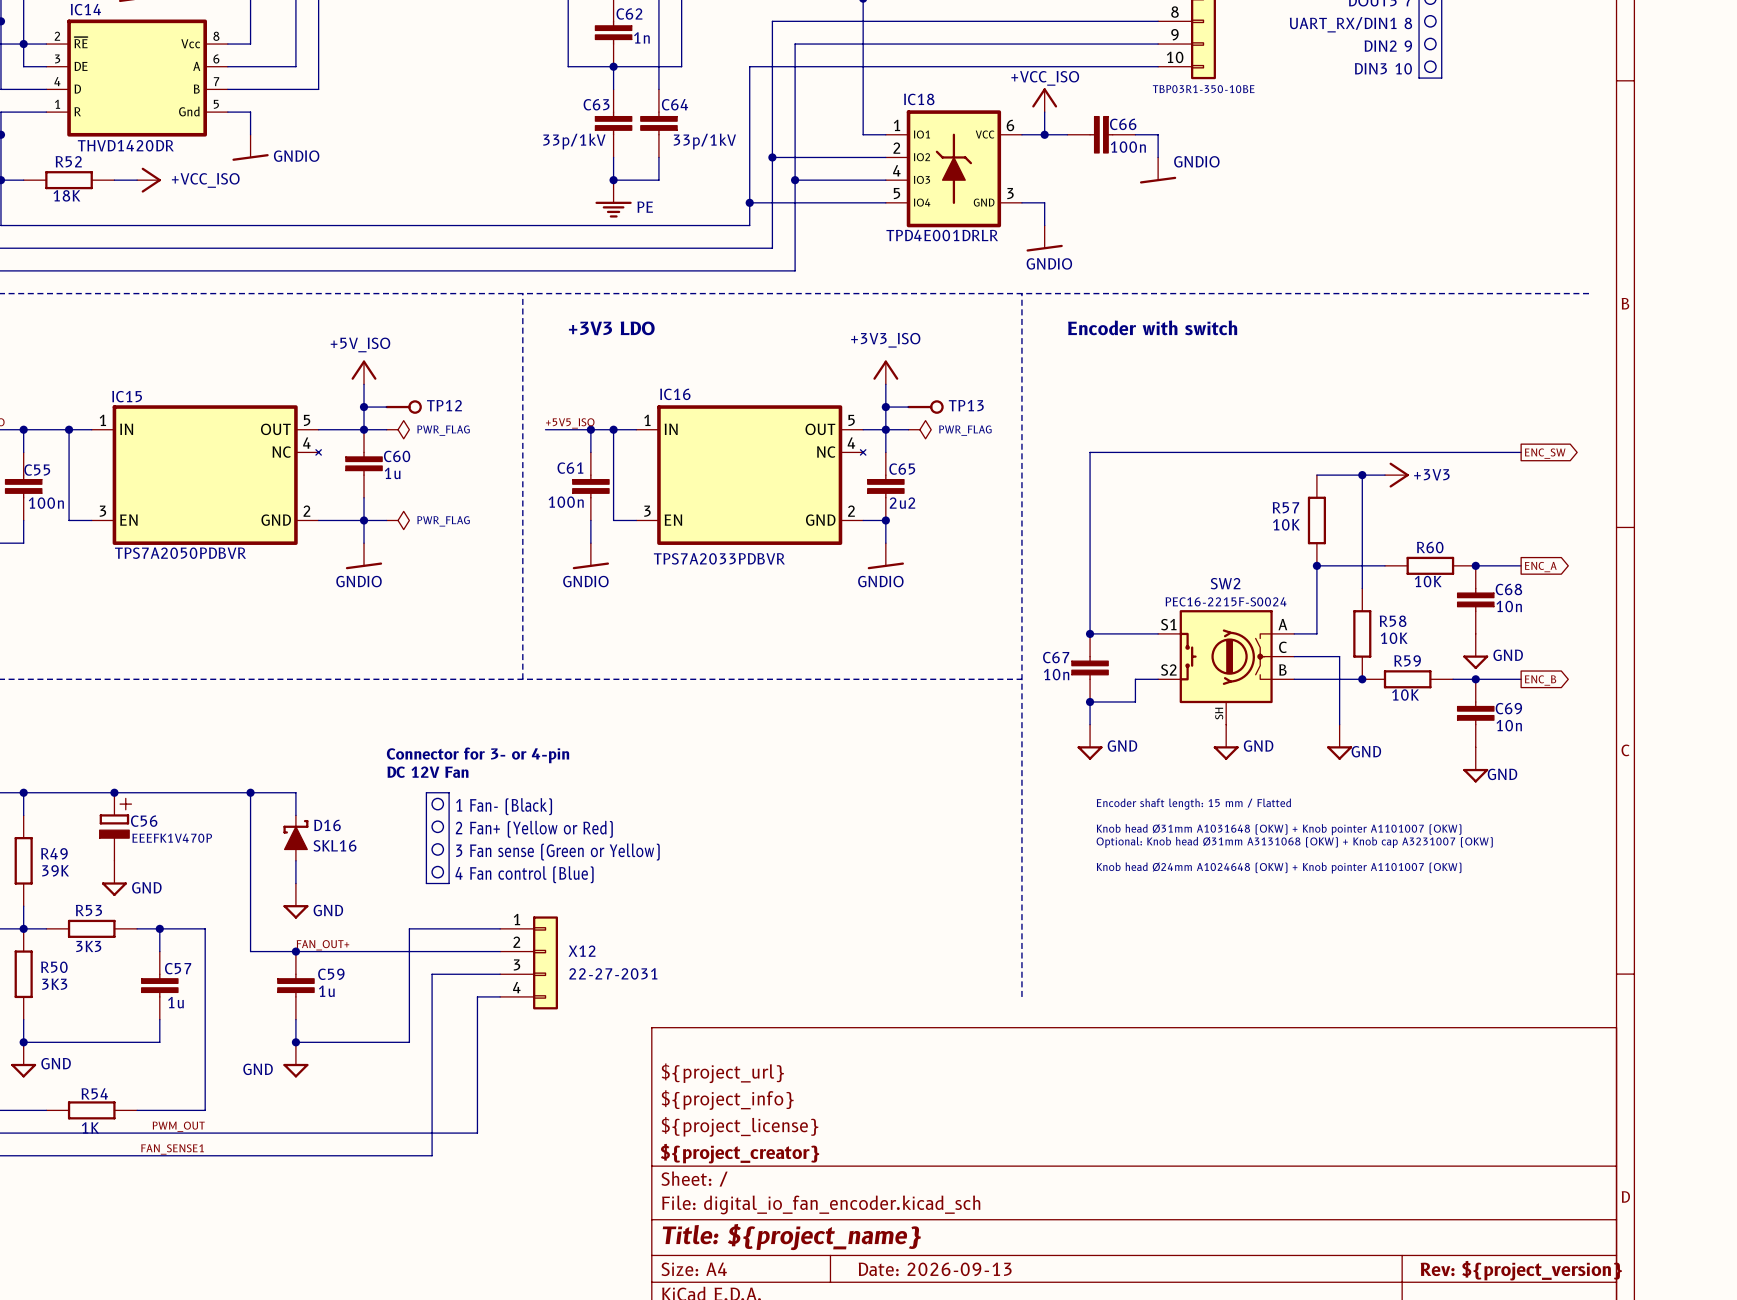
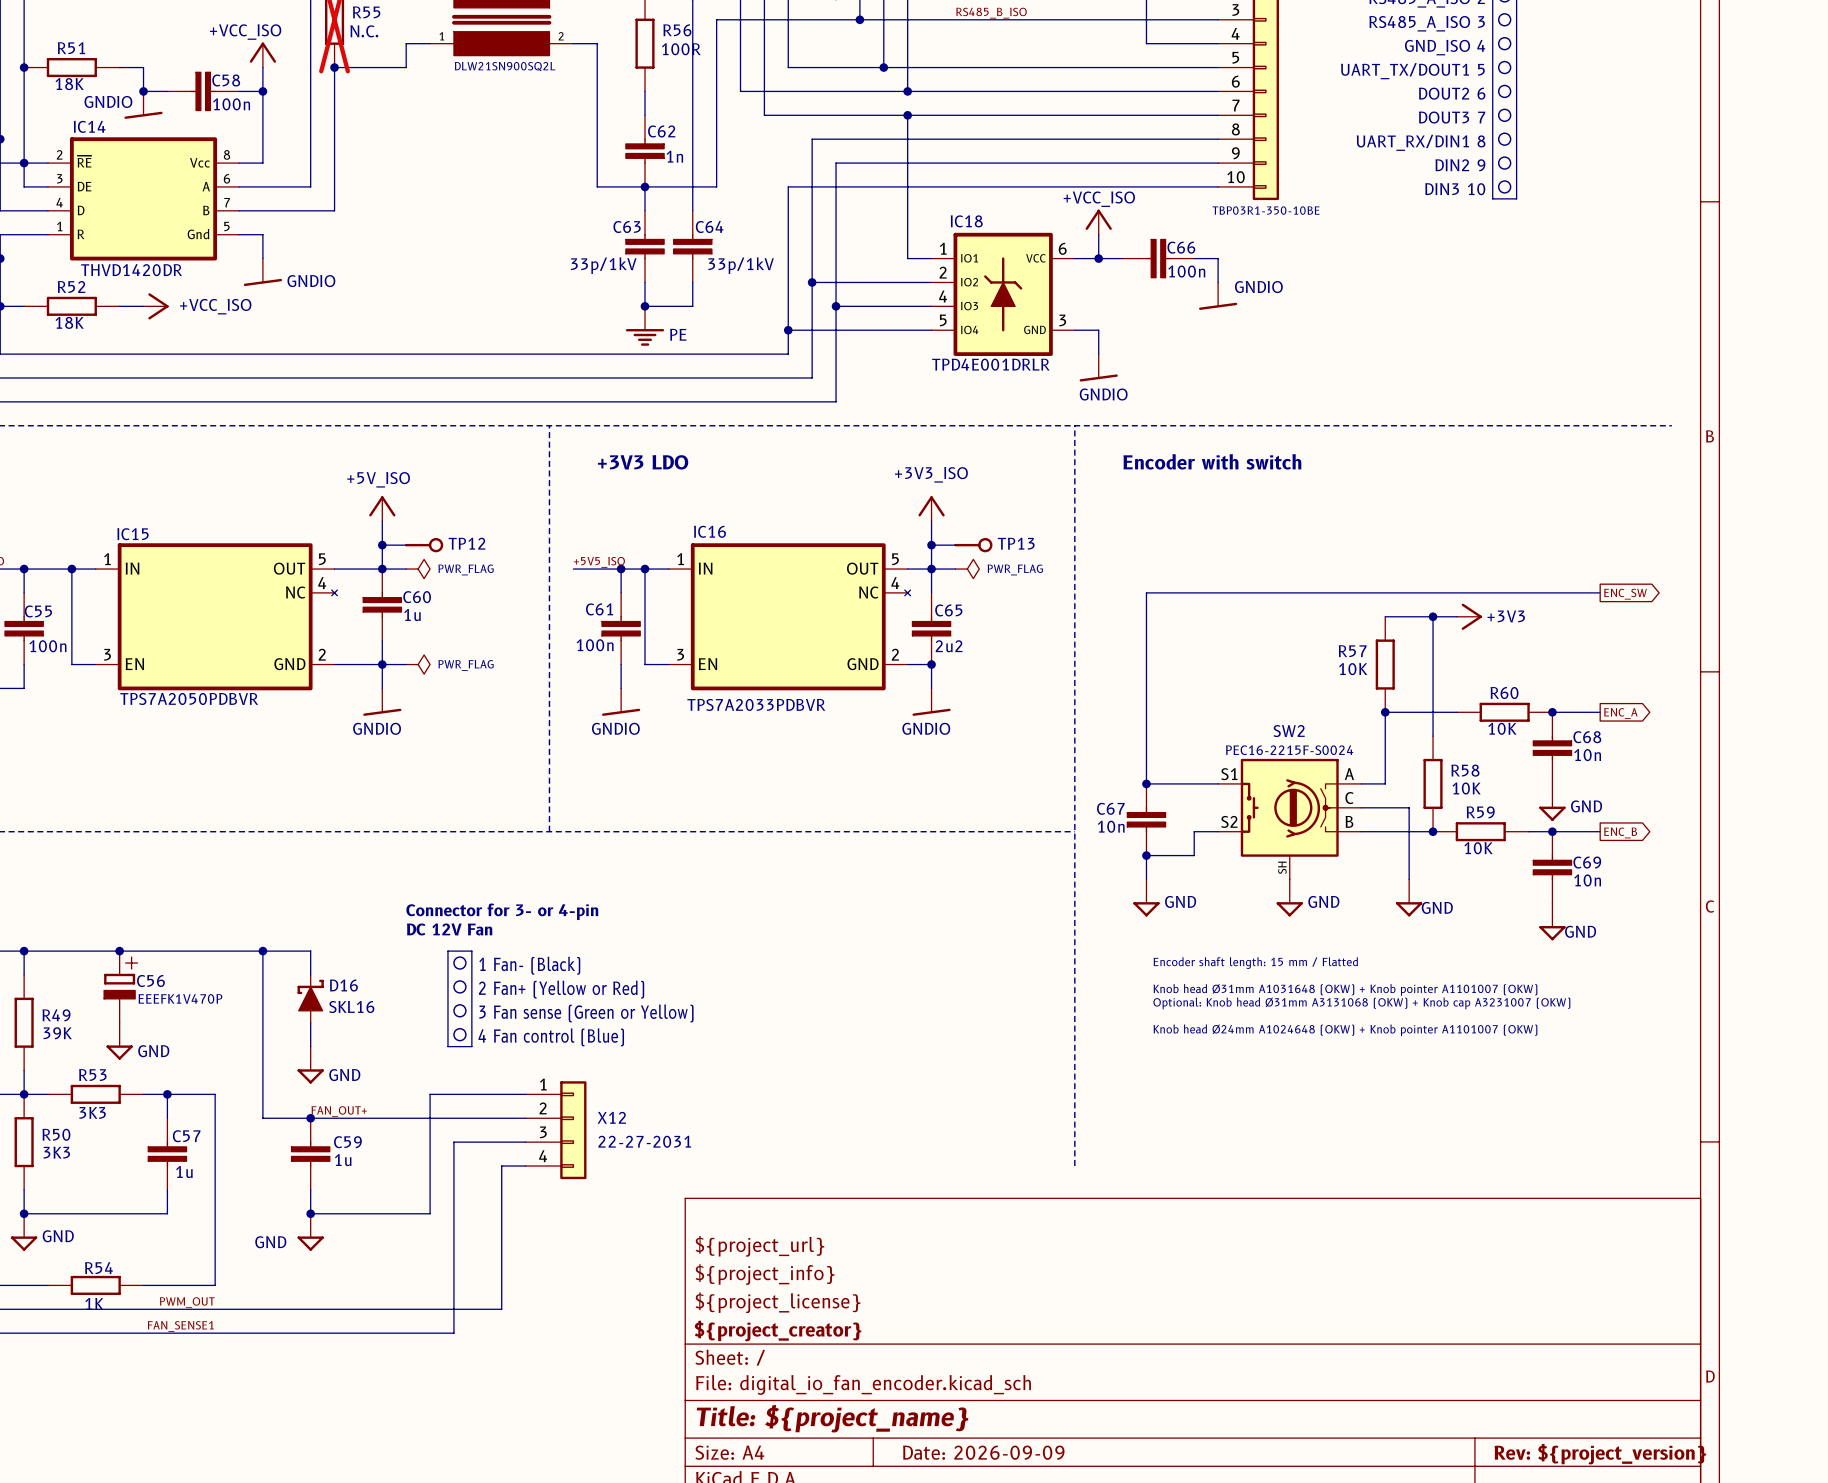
title block: Date: 2026-09-13 (935, 1269) -> Date: 2026-09-09 (983, 1452)

